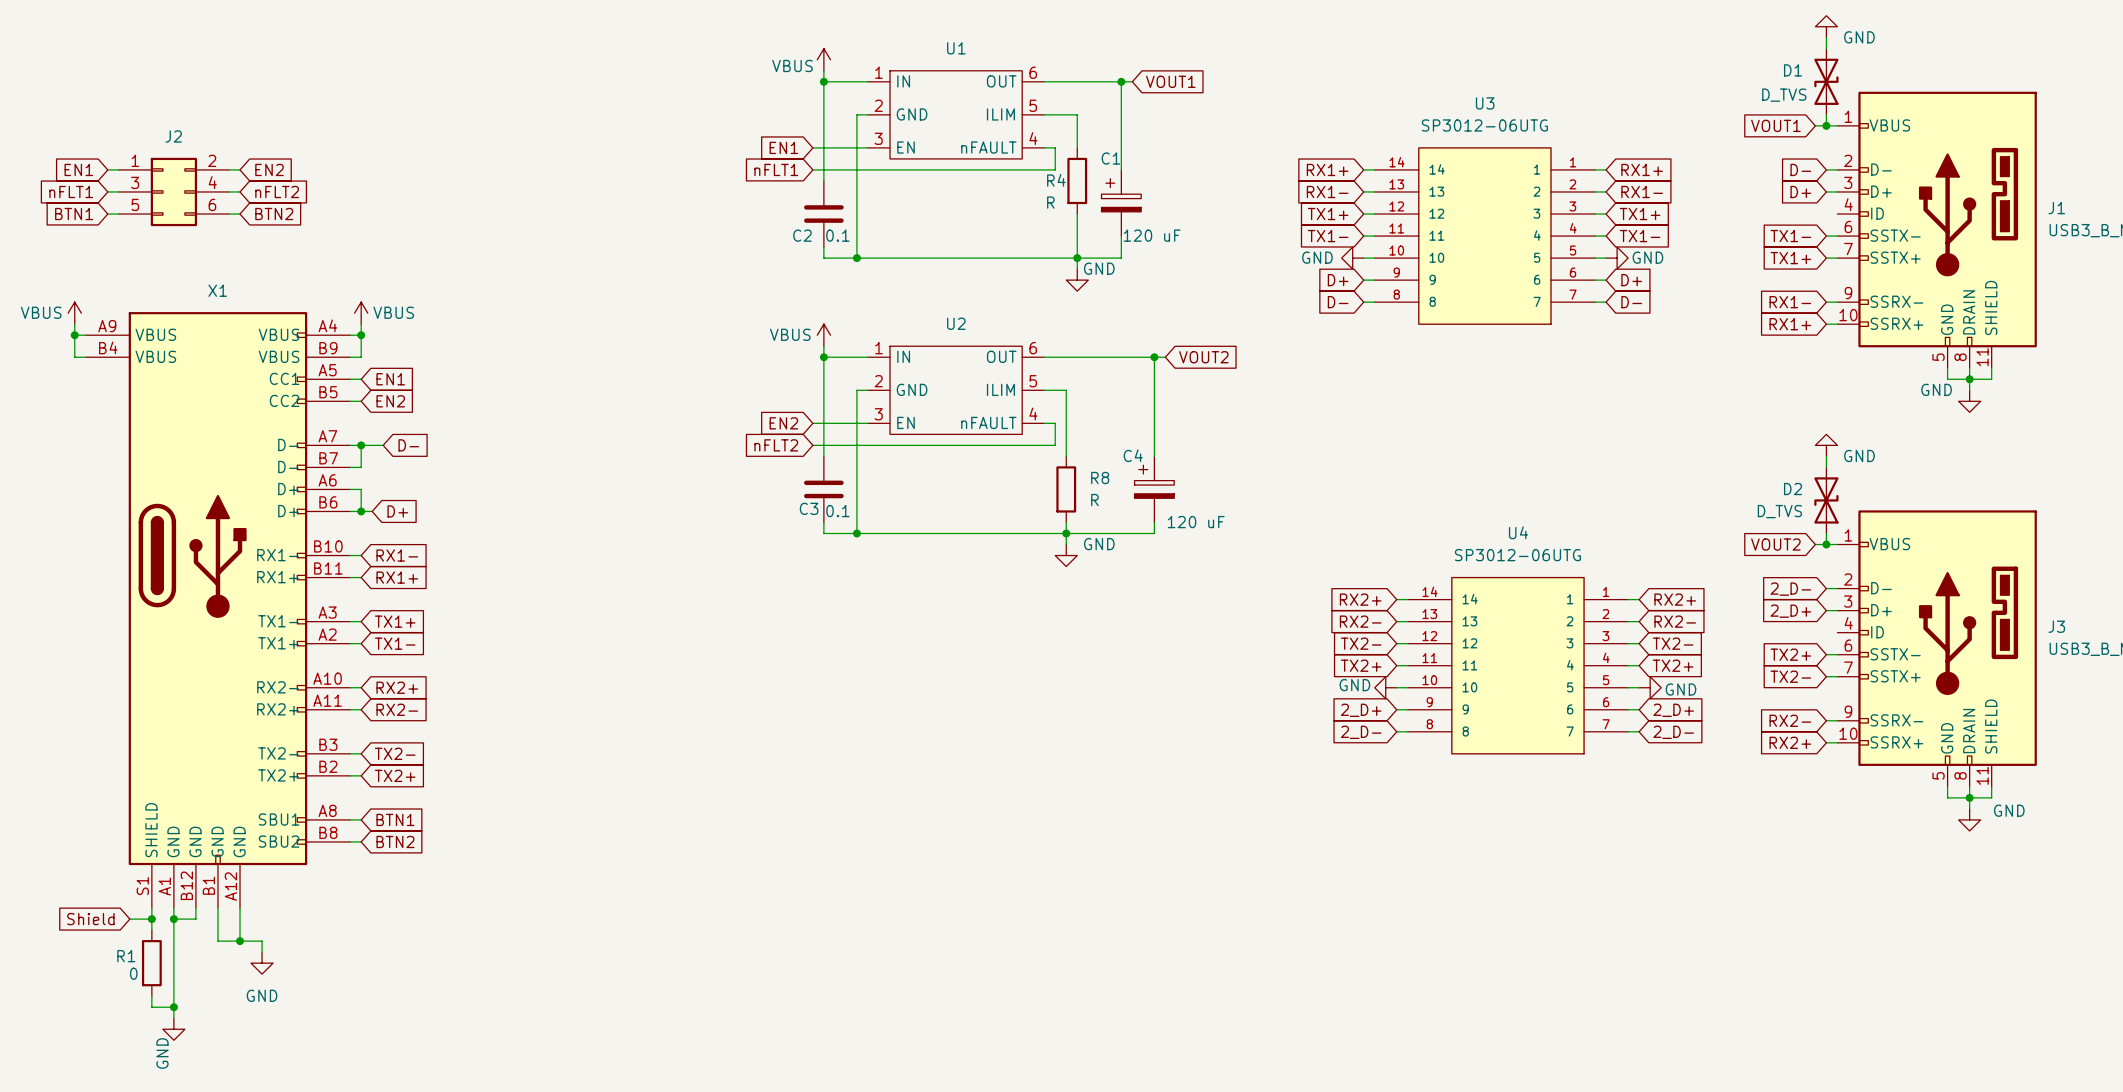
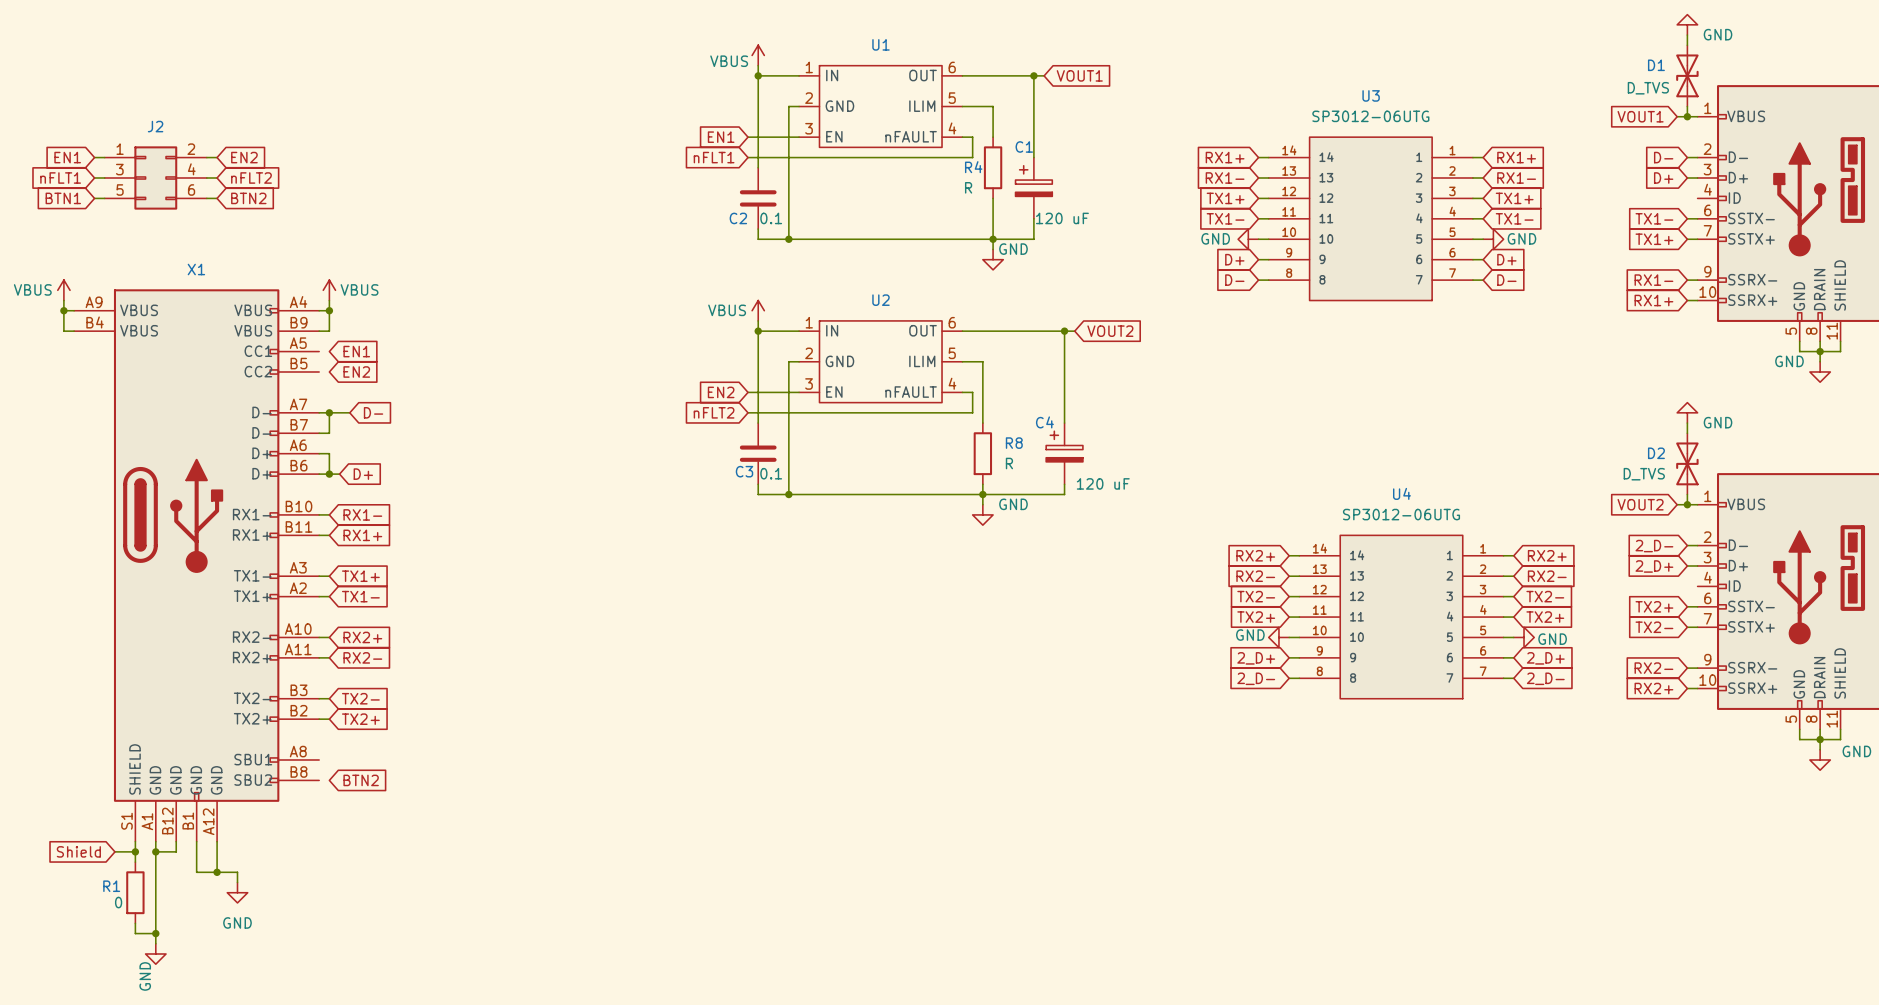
wire: (350, 379) (361, 379) -> none
wire: (350, 401) (361, 401) -> none
wire: (350, 819) (361, 819) -> none
global label: BTN1 (395, 819) -> none
wire: (350, 841) (361, 841) -> none

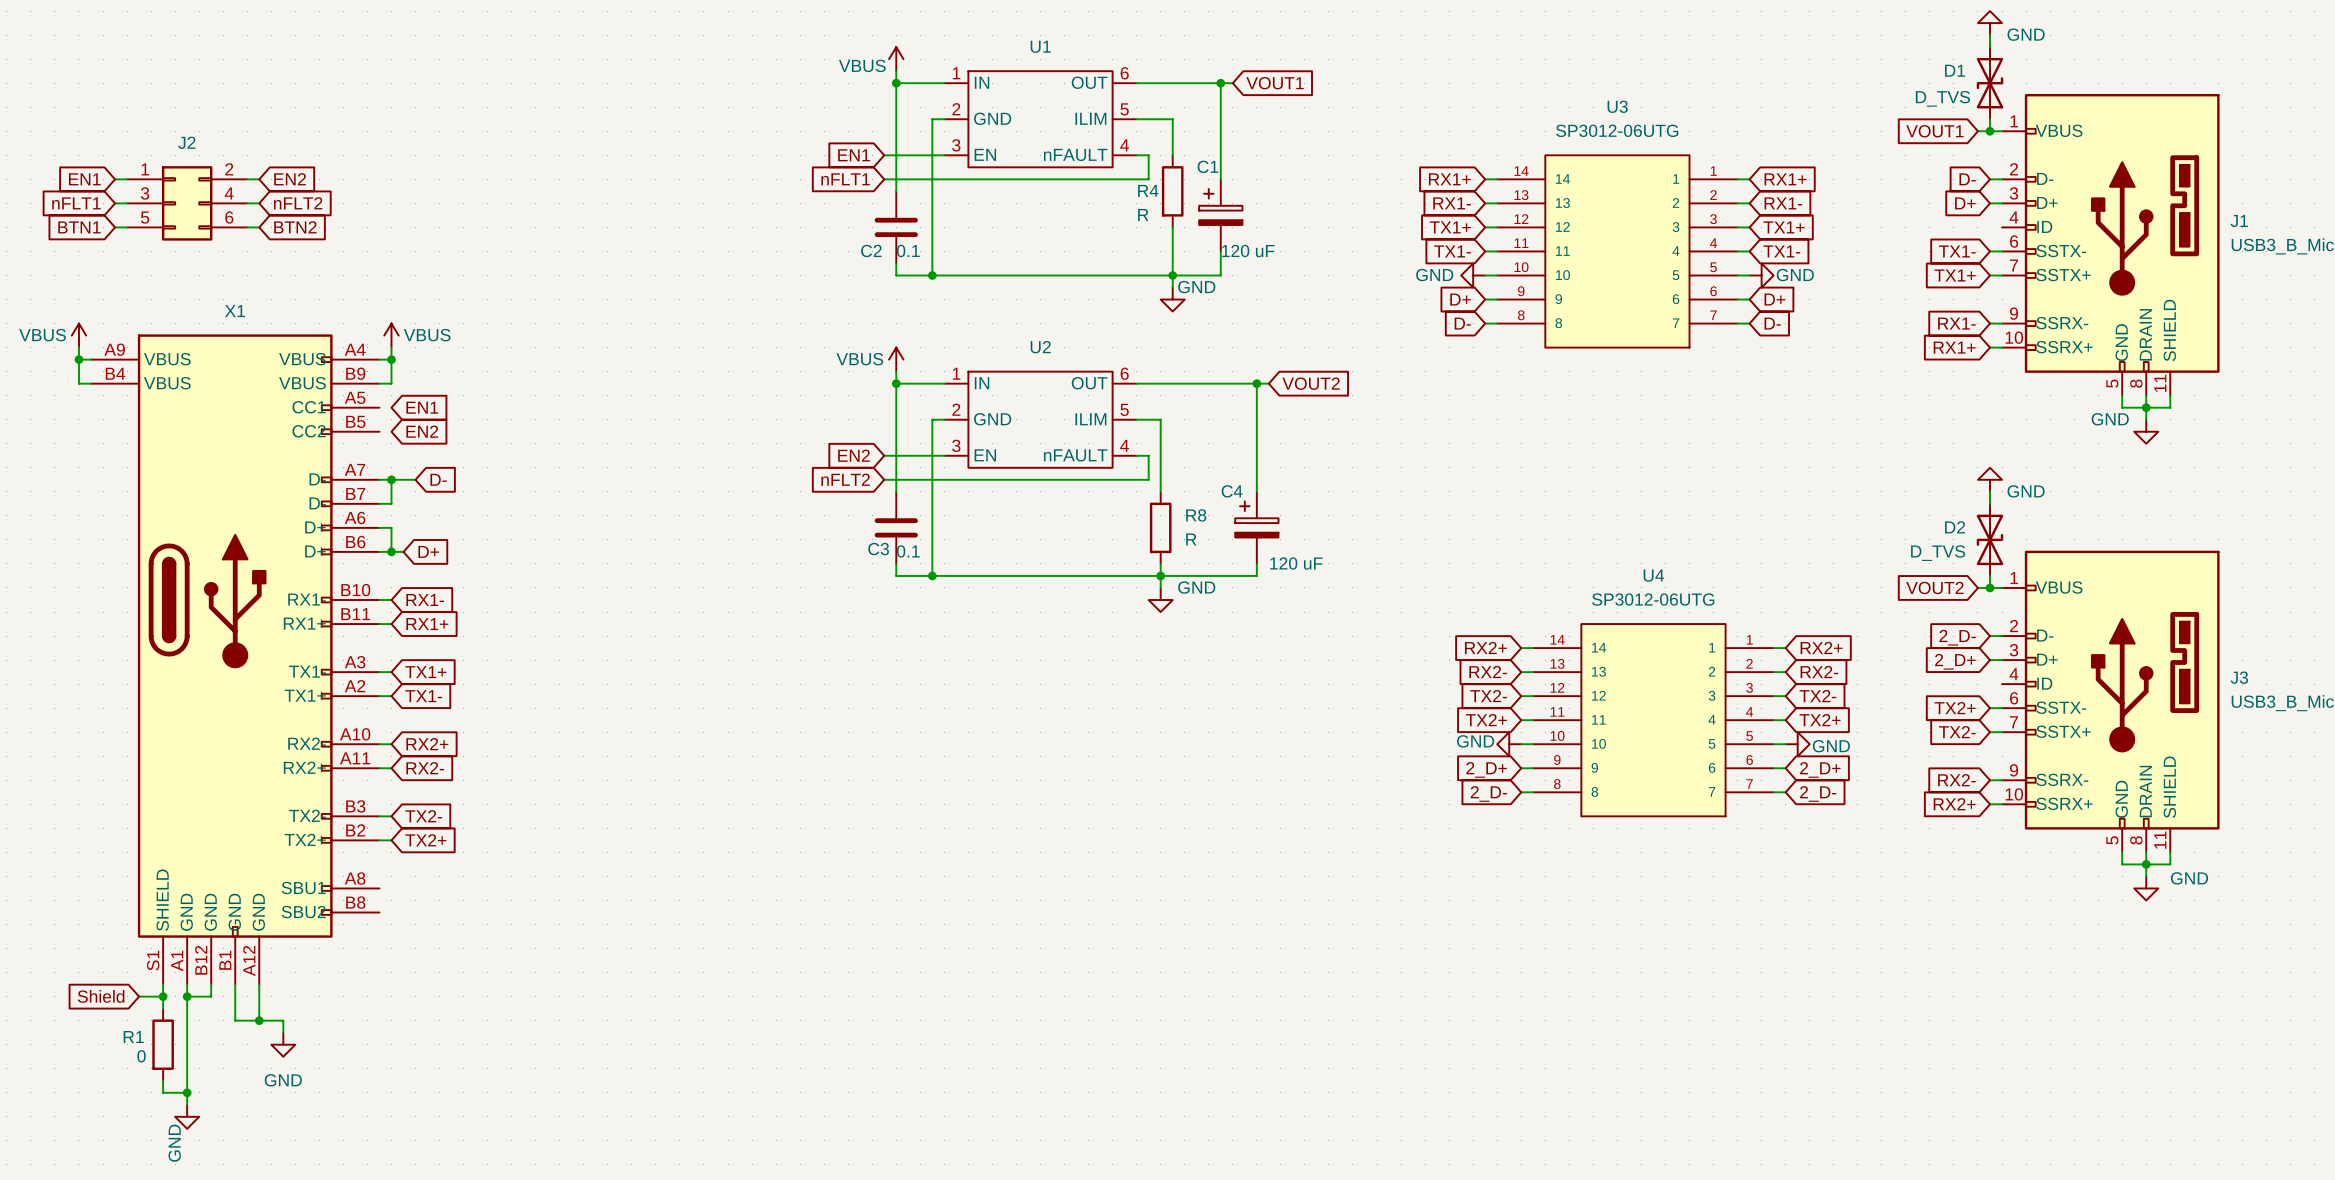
global label: BTN2 (361, 780) -> none

